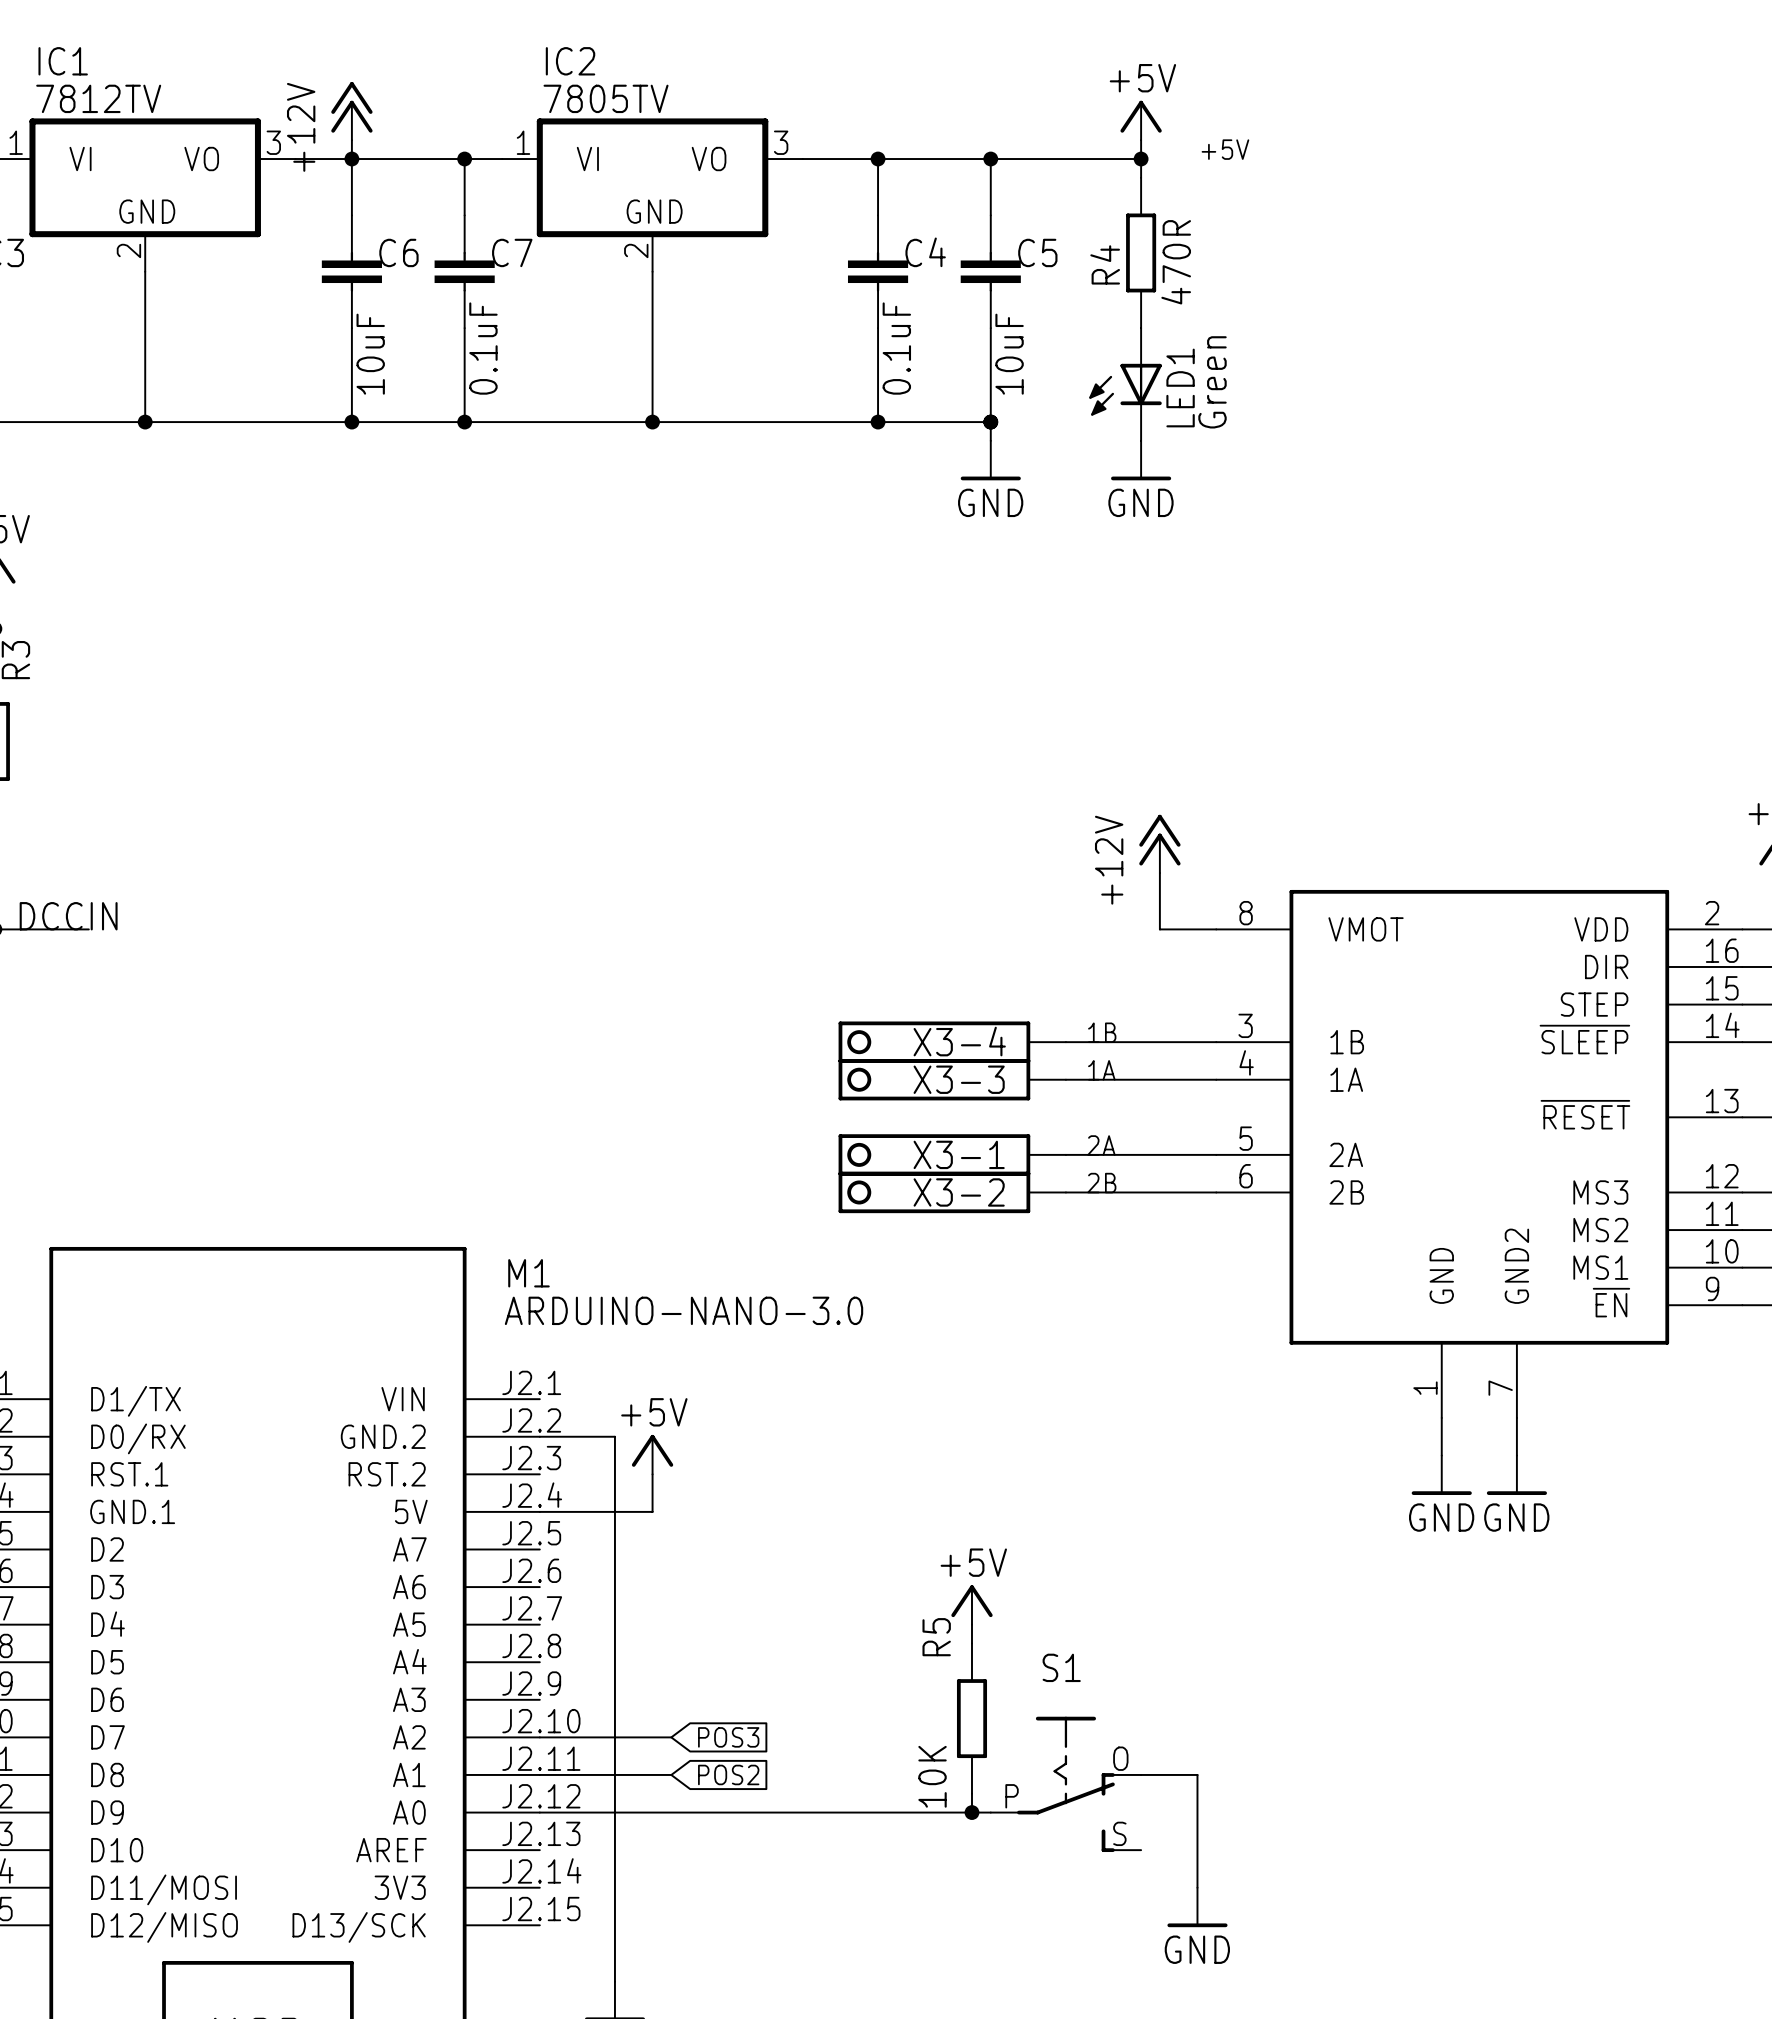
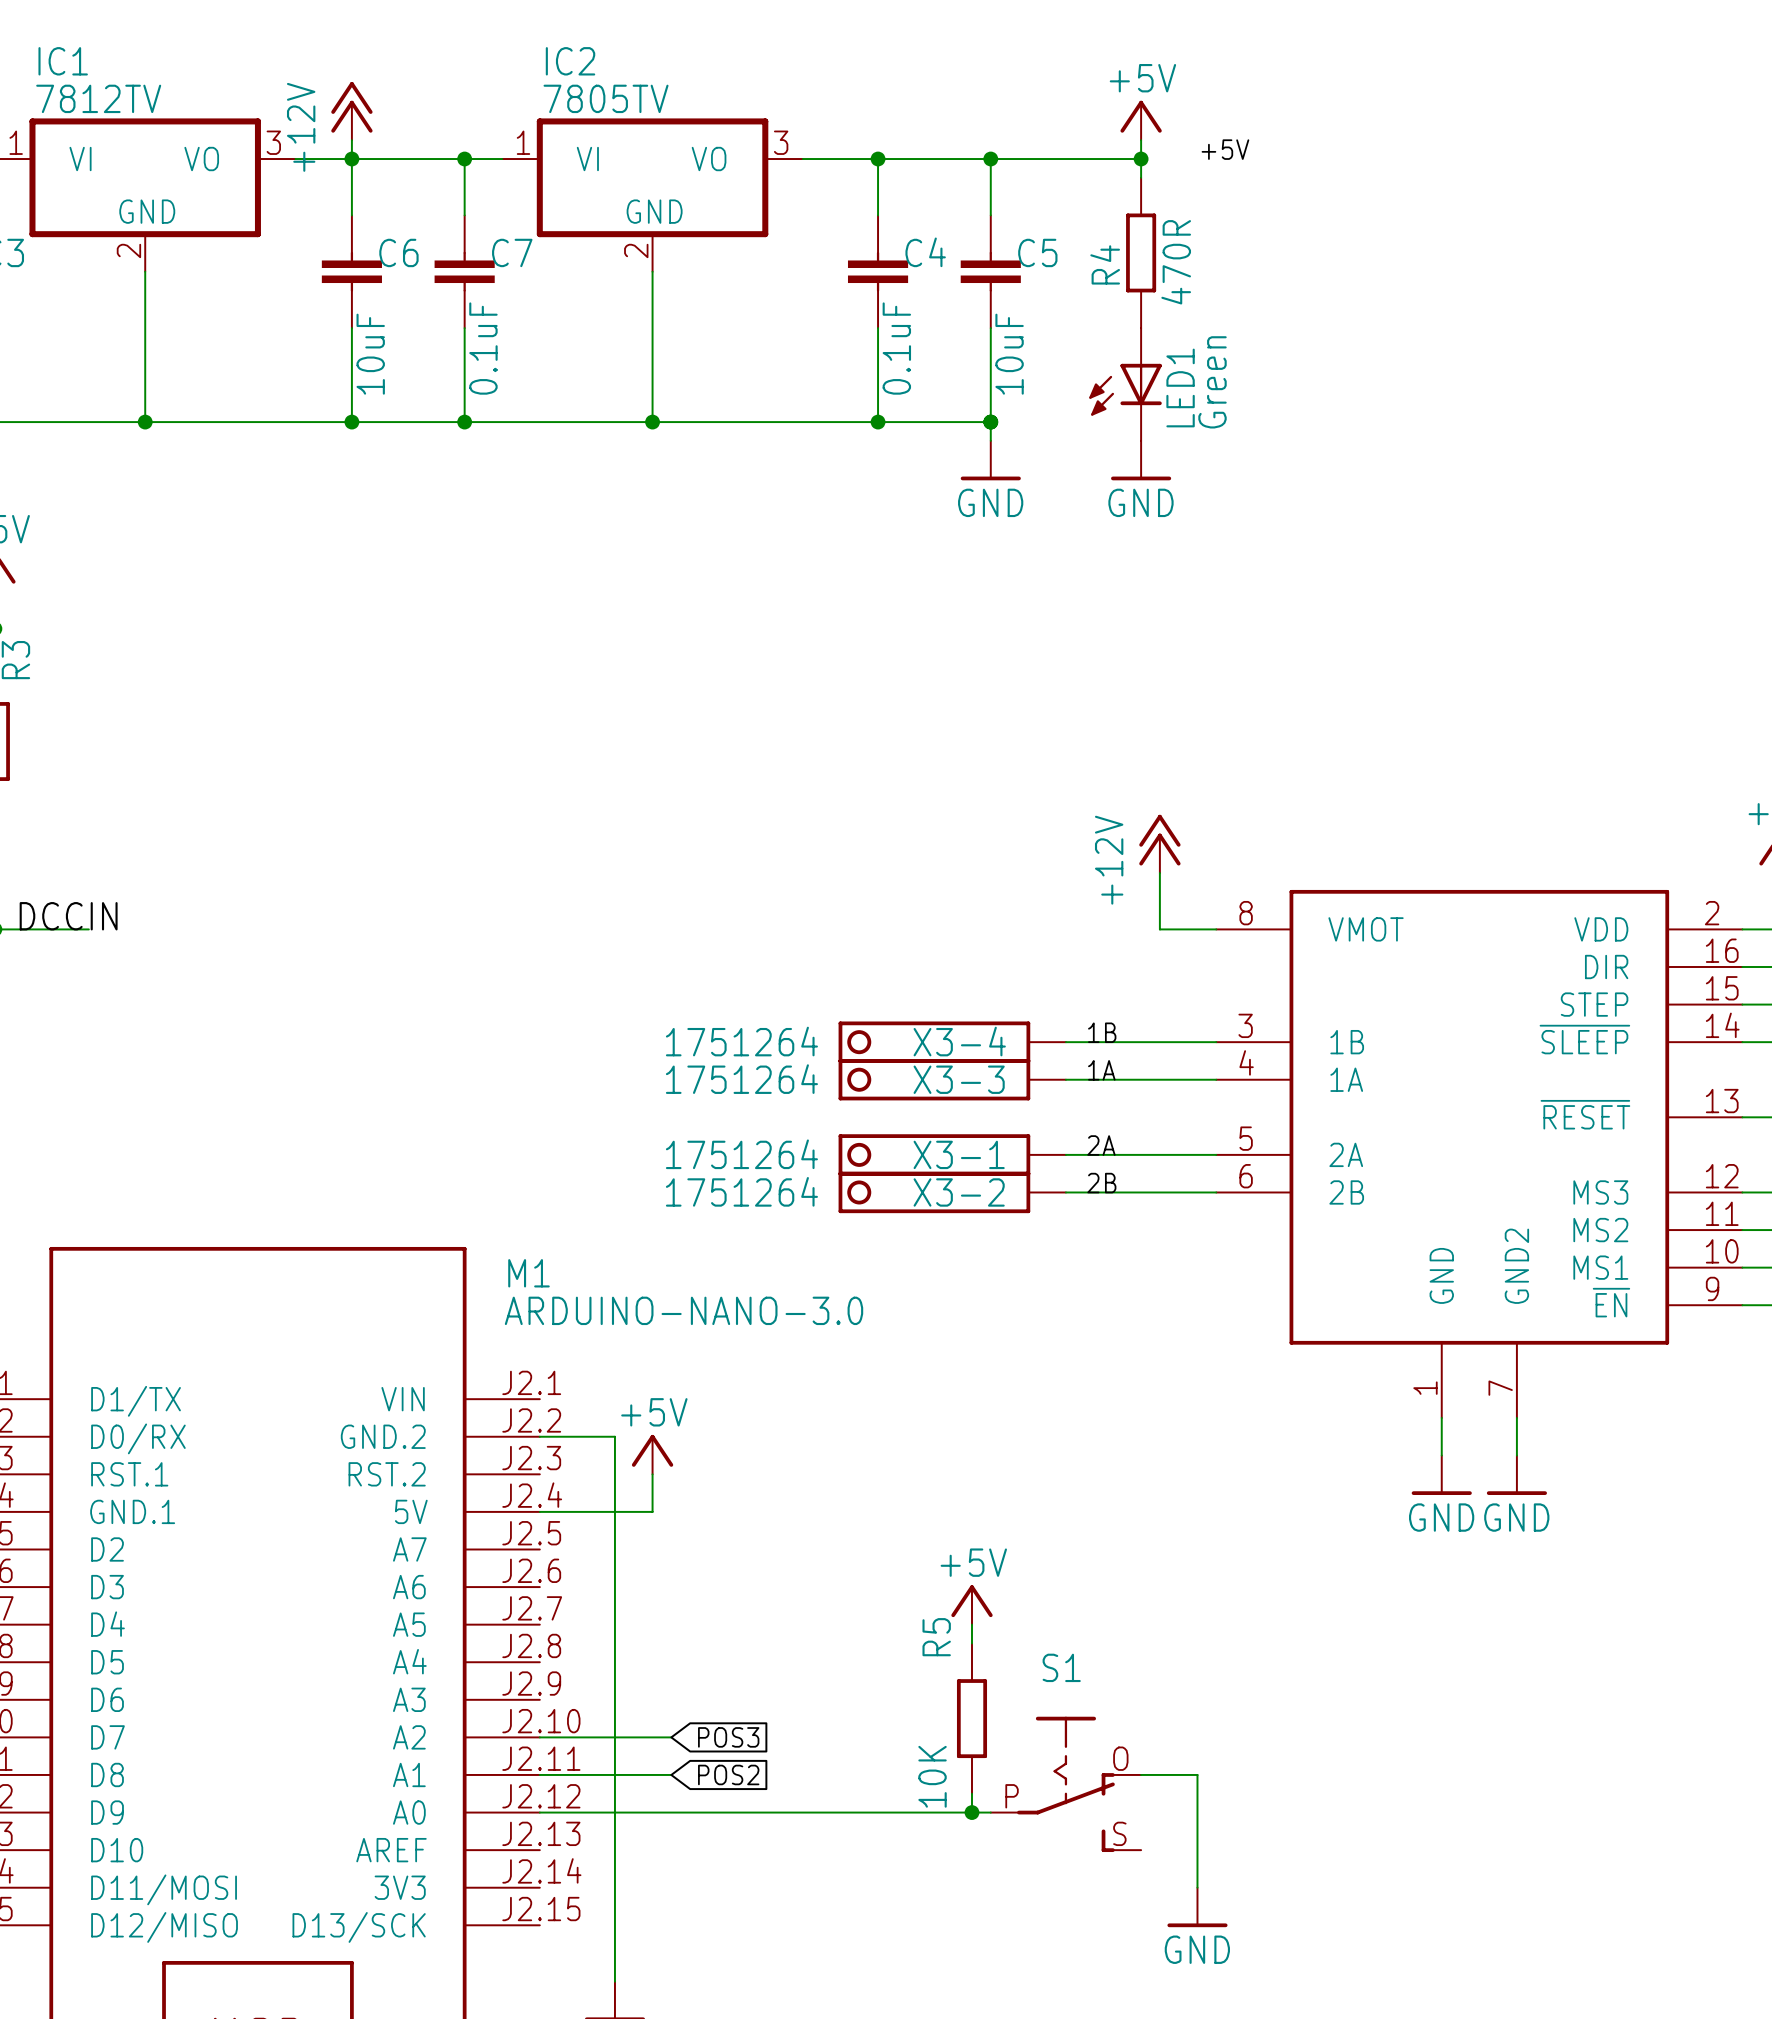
X3-4 value: none -> 1751264 (741, 1041)
X3-3 value: none -> 1751264 (741, 1079)
X3-1 value: none -> 1751264 (741, 1154)
X3-2 value: none -> 1751264 (741, 1191)

